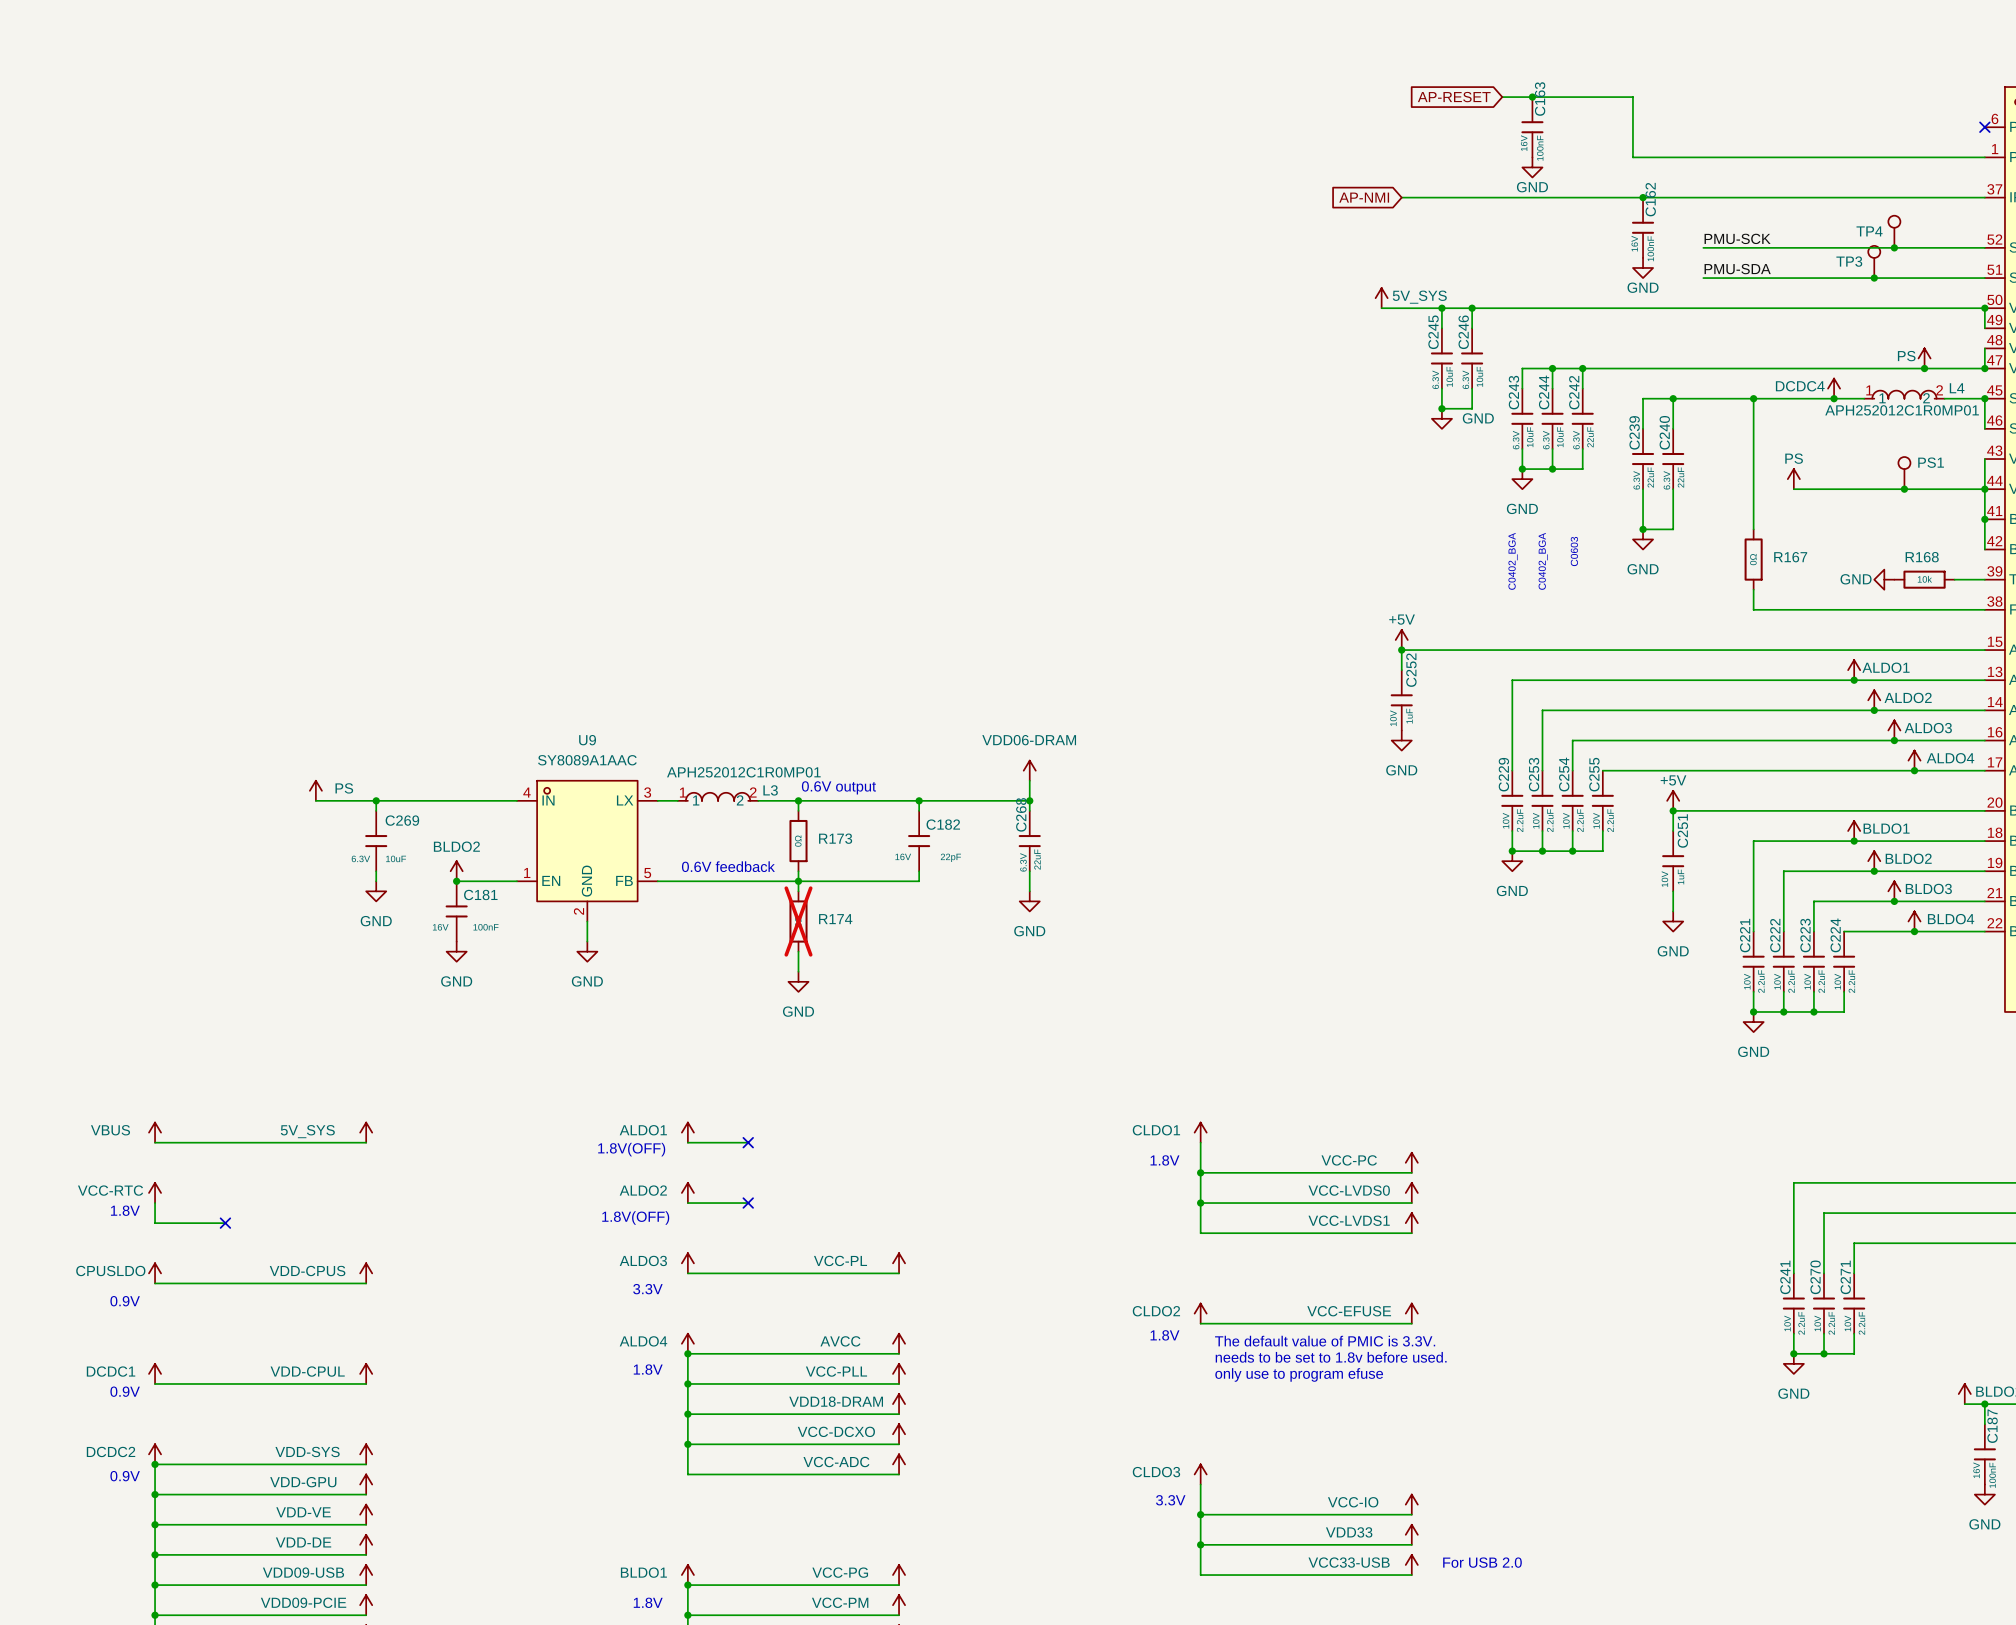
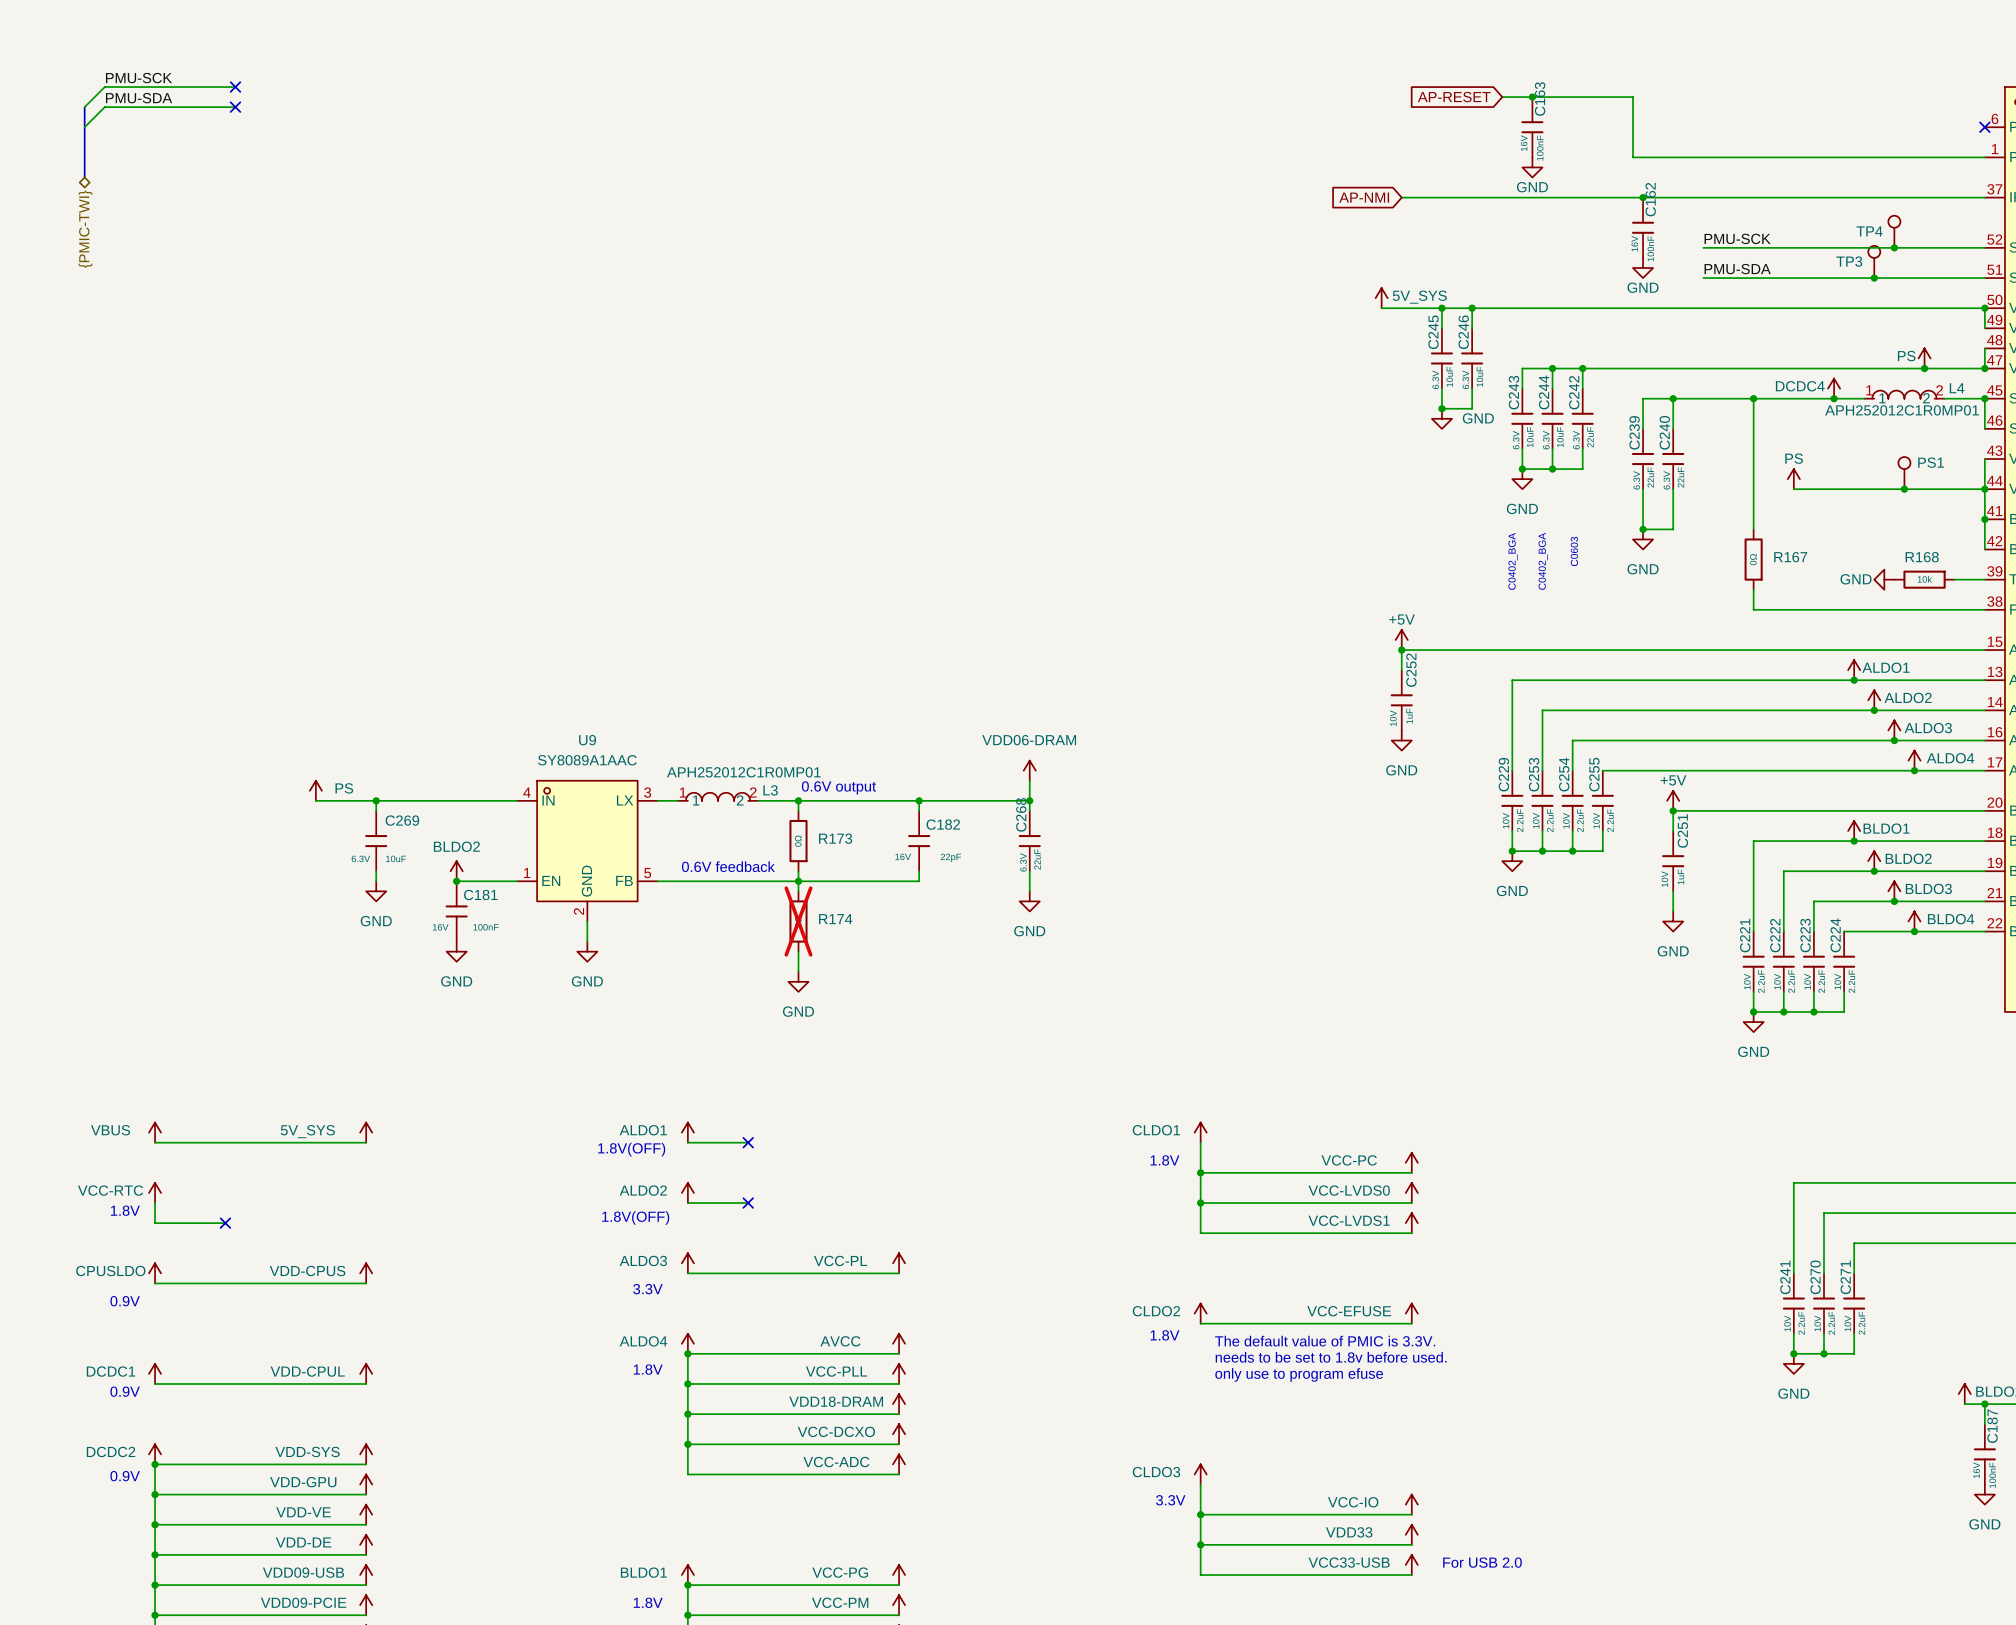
label: none -> PMU-SCK (138, 78)
wire: none -> (235, 87) (104, 87) (84, 107)
no-connect mark: none -> (235, 87)
label: none -> PMU-SDA (139, 98)
bus: none -> (84, 107) (84, 177)
wire: none -> (235, 107) (104, 107) (84, 127)
no-connect mark: none -> (235, 107)
hierarchical label: none -> {PMIC-TWI} (85, 229)

